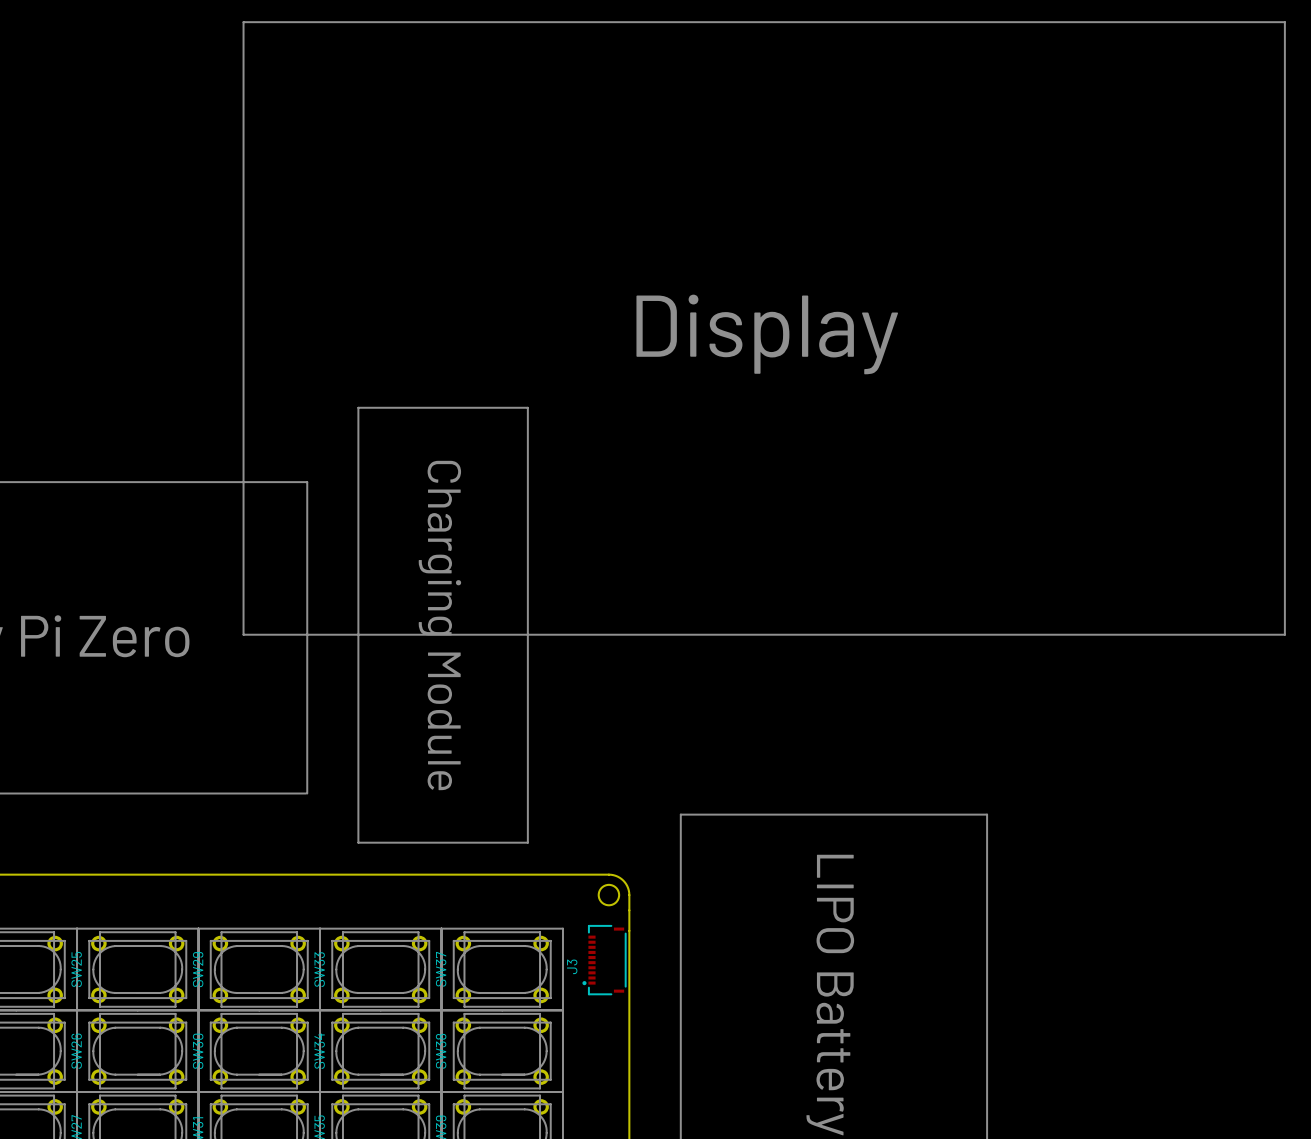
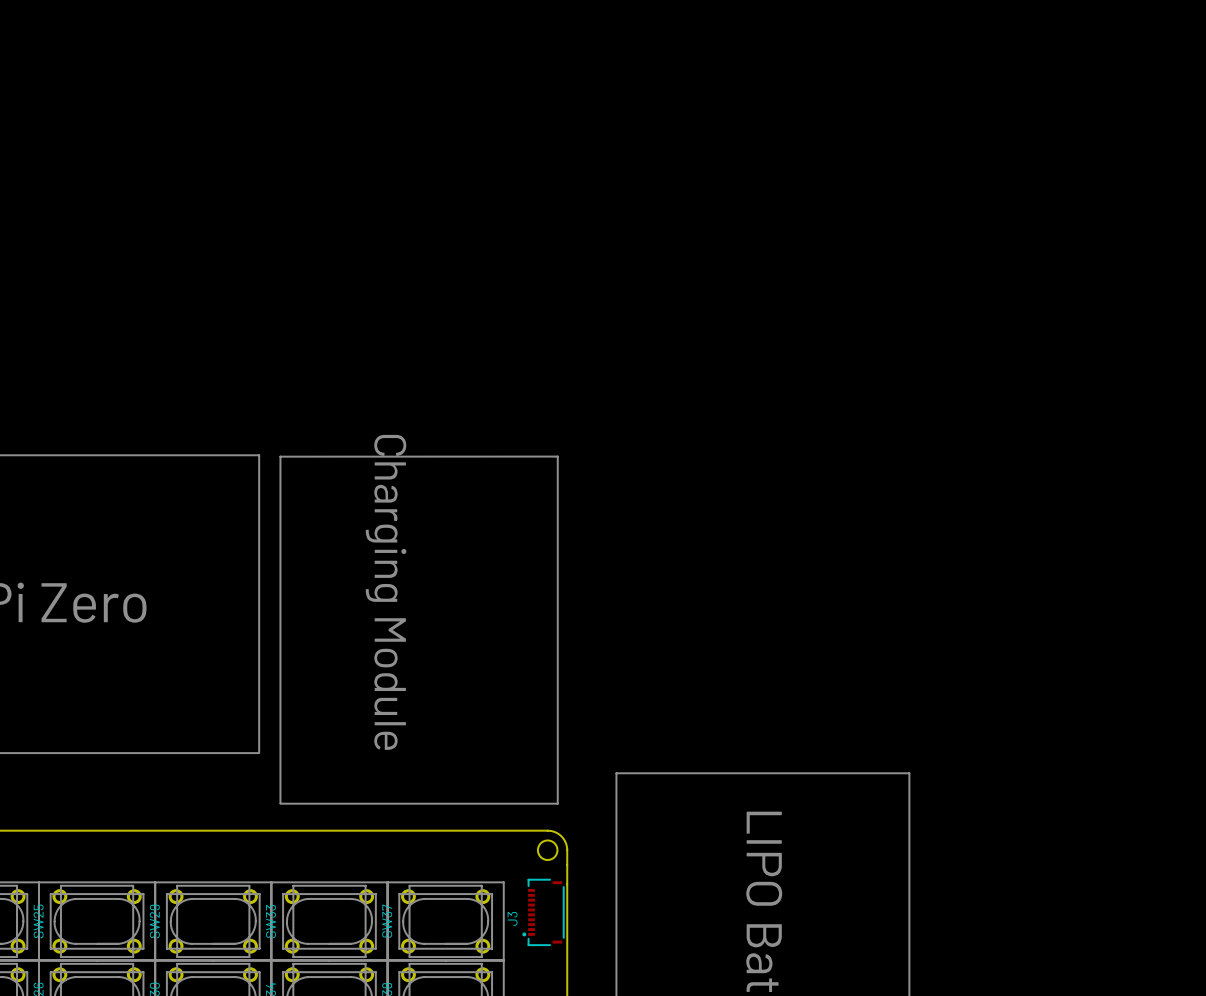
line: (243, 22) (243, 634) (1284, 634) (1284, 22) (243, 22) -> none
text: Display (767, 334) -> none
line: (358, 407) (358, 842) (527, 842) (527, 407) (358, 407) -> none
line: none -> (280, 456) (280, 803)
line: none -> (280, 456) (557, 456) (557, 803) (280, 803)

